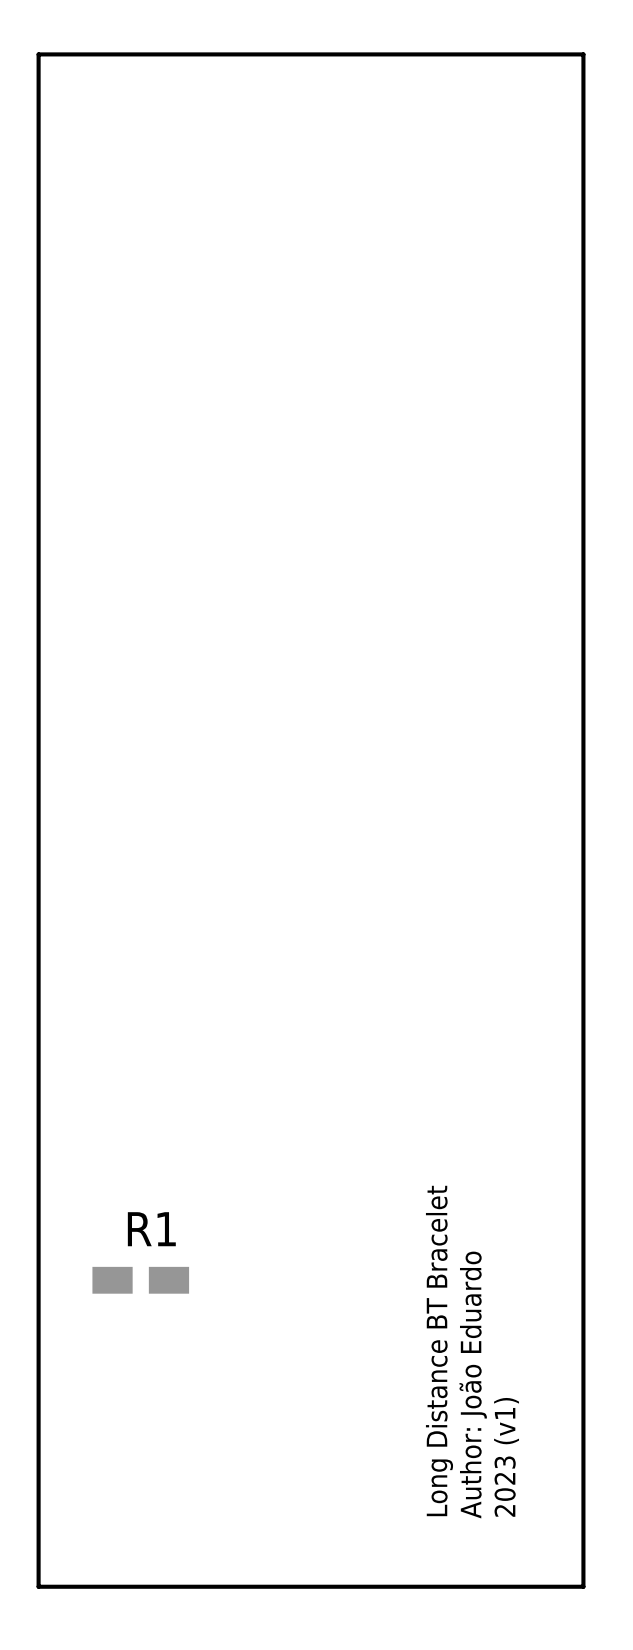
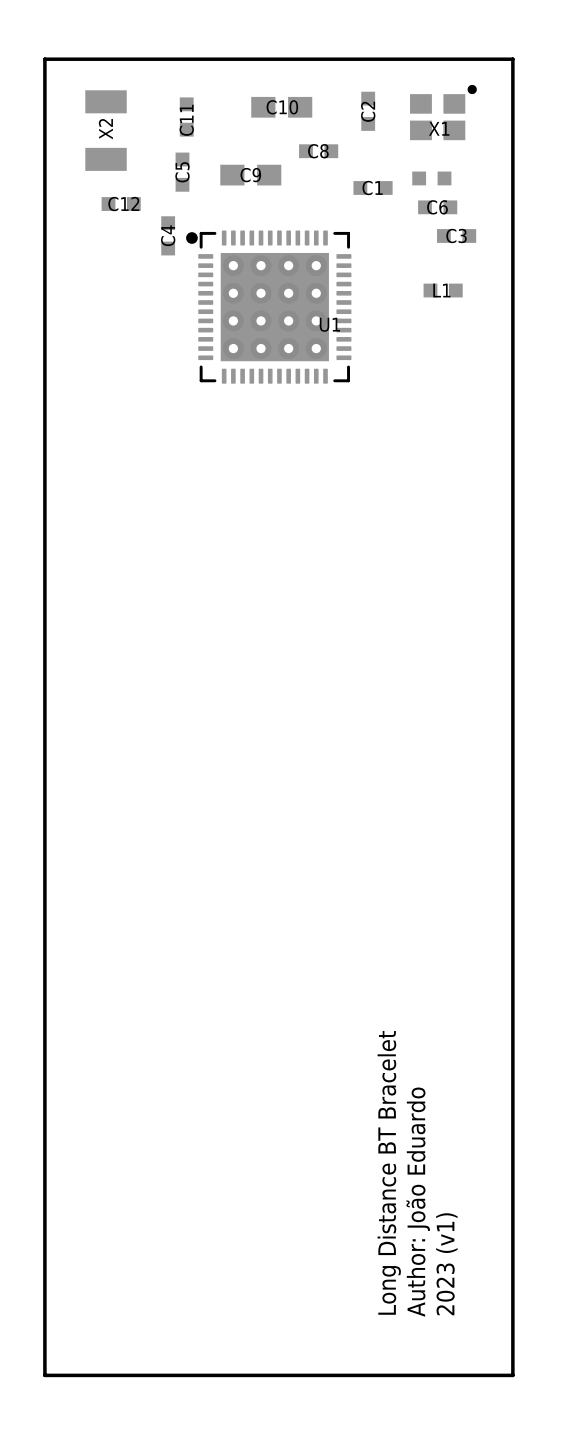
C10: none -> (281, 107)
C2: none -> (368, 111)
X1: none -> (443, 112)
C11: none -> (186, 117)
X2: none -> (106, 130)
C8: none -> (318, 151)
C5: none -> (182, 172)
C9: none -> (250, 175)
part: none -> (431, 178)
C1: none -> (373, 187)
C12: none -> (121, 204)
C6: none -> (437, 207)
C4: none -> (168, 235)
C3: none -> (456, 235)
L1: none -> (443, 290)
U1: none -> (268, 307)
R1: (140, 1280) -> none

